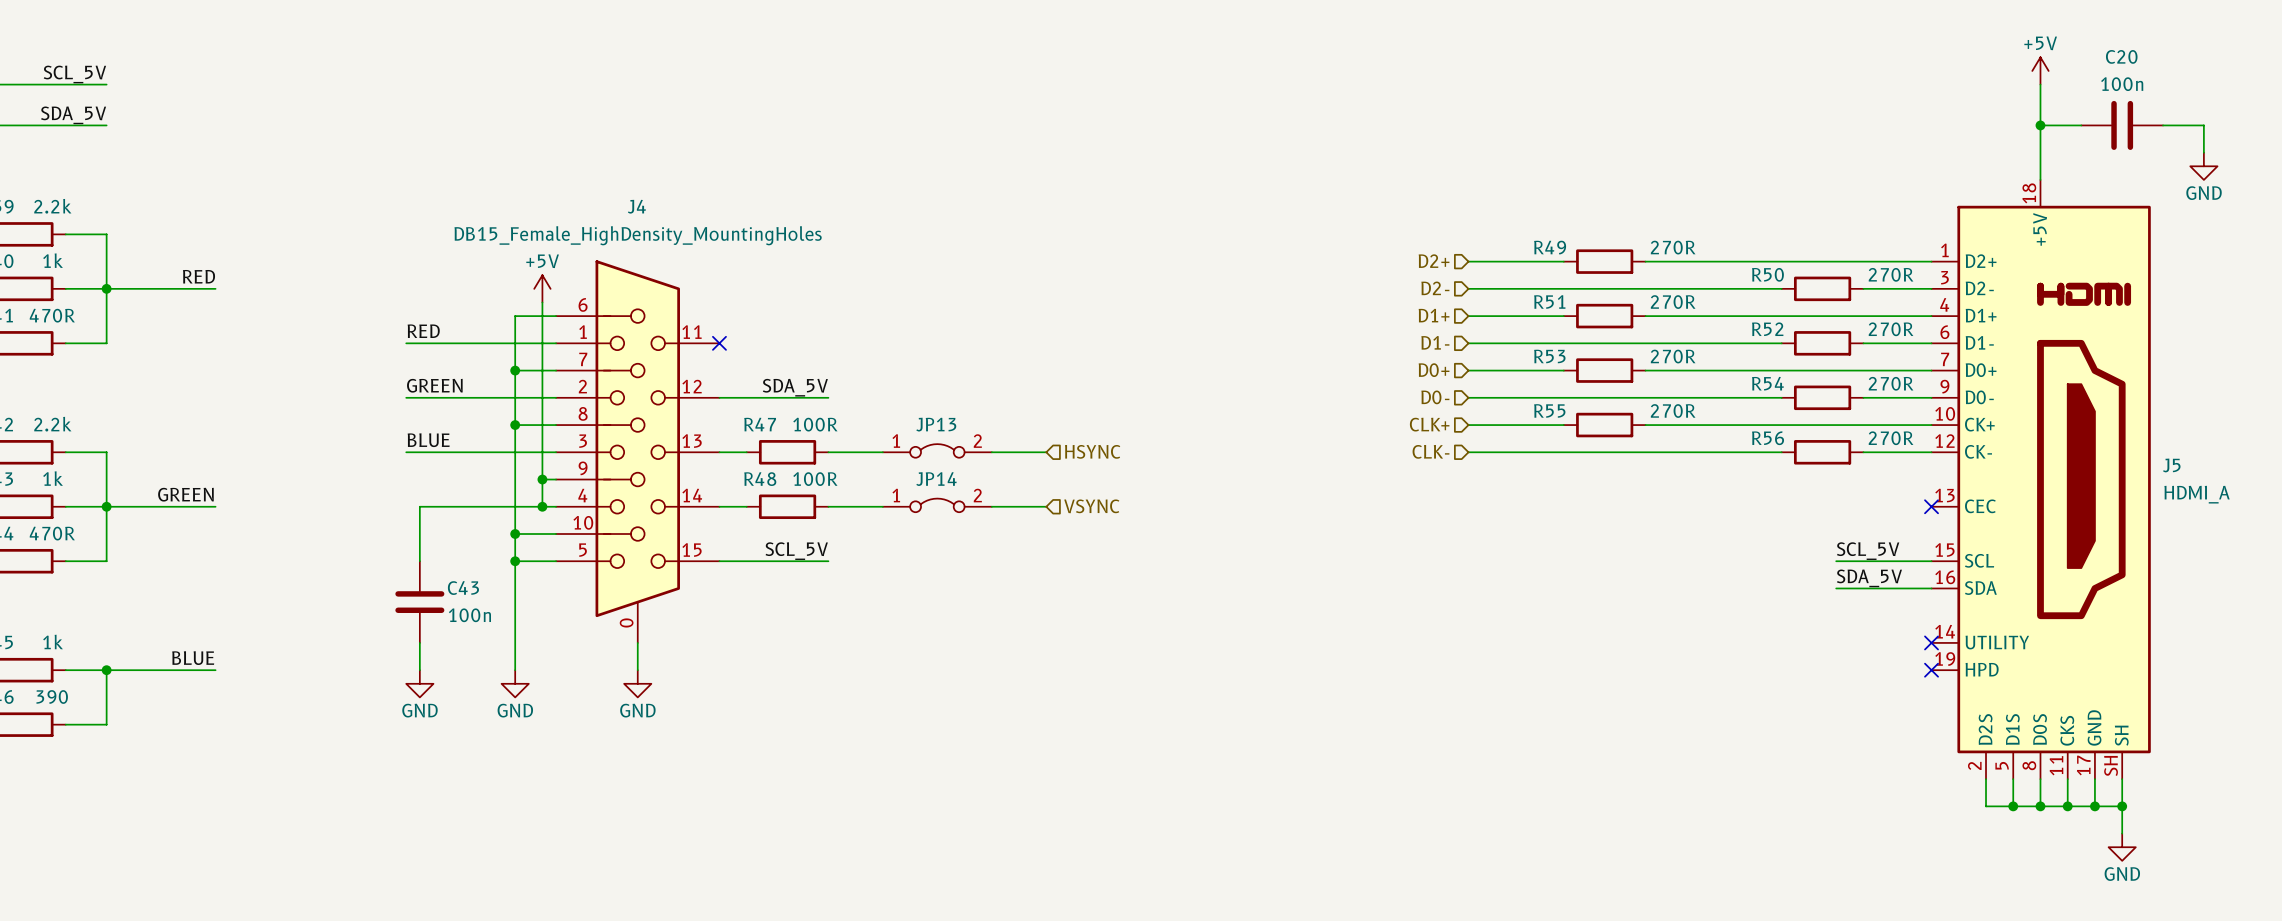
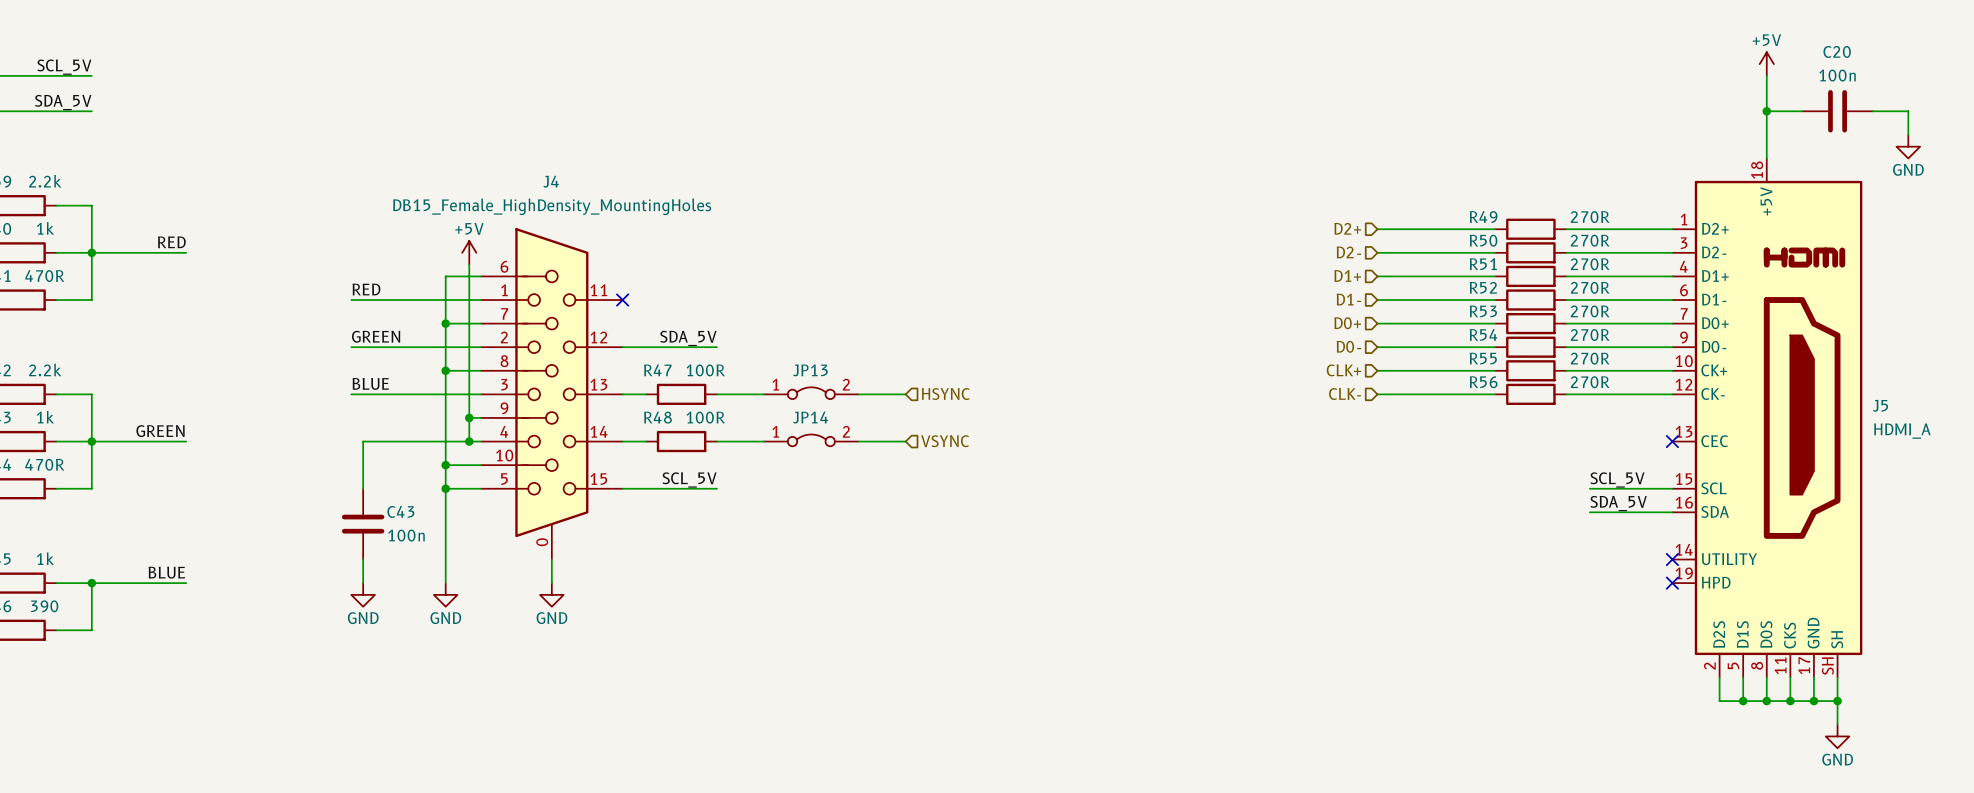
hierarchical label position: D2+ (1434, 261) -> D2+ (1347, 228)
wire: (1468, 261) (1563, 261) -> none
wire: none -> (1377, 229) (1424, 229)
R49 position: (1604, 261) -> (1530, 229)
wire: (1727, 261) (1808, 261) -> none
hierarchical label position: D2- (1435, 288) -> D2- (1348, 252)
wire: (1468, 288) (1591, 288) -> none
wire: (1727, 288) (1781, 288) -> (1566, 252) (1613, 252)
R50 position: (1822, 288) -> (1530, 252)
hierarchical label position: D1+ (1434, 315) -> D1+ (1347, 275)
wire: (1468, 316) (1563, 316) -> none
wire: none -> (1377, 276) (1424, 276)
R51 position: (1604, 316) -> (1530, 276)
wire: (1727, 316) (1808, 316) -> none
hierarchical label position: D1- (1435, 342) -> D1- (1348, 299)
wire: (1468, 343) (1591, 343) -> none
wire: (1727, 343) (1781, 343) -> (1566, 300) (1613, 300)
R52 position: (1822, 343) -> (1530, 300)
hierarchical label position: D0+ (1434, 370) -> D0+ (1347, 323)
wire: (1468, 370) (1563, 370) -> none
wire: none -> (1377, 323) (1424, 323)
R53 position: (1604, 370) -> (1530, 323)
wire: (1727, 370) (1808, 370) -> none
hierarchical label position: D0- (1435, 397) -> D0- (1348, 346)
wire: (1468, 397) (1591, 397) -> none
wire: (1727, 397) (1781, 397) -> (1566, 347) (1613, 347)
R54 position: (1822, 397) -> (1530, 347)
hierarchical label position: CLK+ (1429, 424) -> CLK+ (1343, 370)
wire: (1468, 425) (1563, 425) -> none
wire: none -> (1377, 370) (1424, 370)
R55 position: (1604, 425) -> (1530, 370)
wire: (1727, 425) (1808, 425) -> none
hierarchical label position: CLK- (1430, 451) -> CLK- (1345, 394)
wire: (1468, 452) (1591, 452) -> none
wire: (1727, 452) (1781, 452) -> (1566, 394) (1613, 394)
R56 position: (1822, 452) -> (1530, 394)

